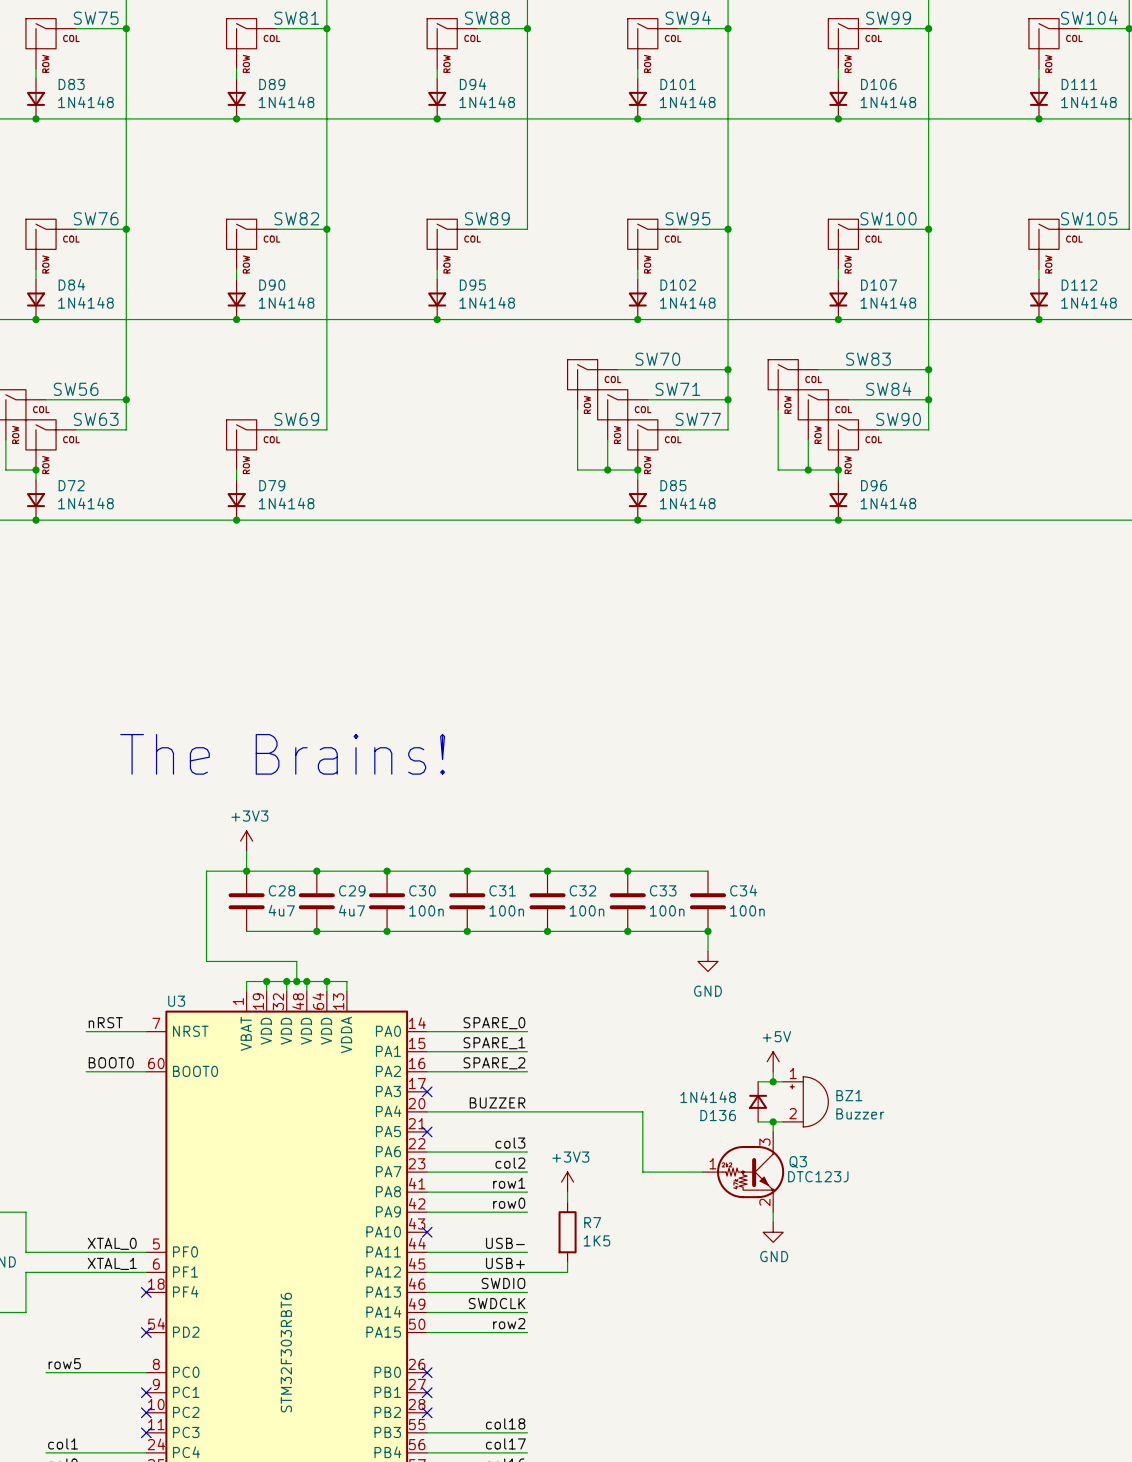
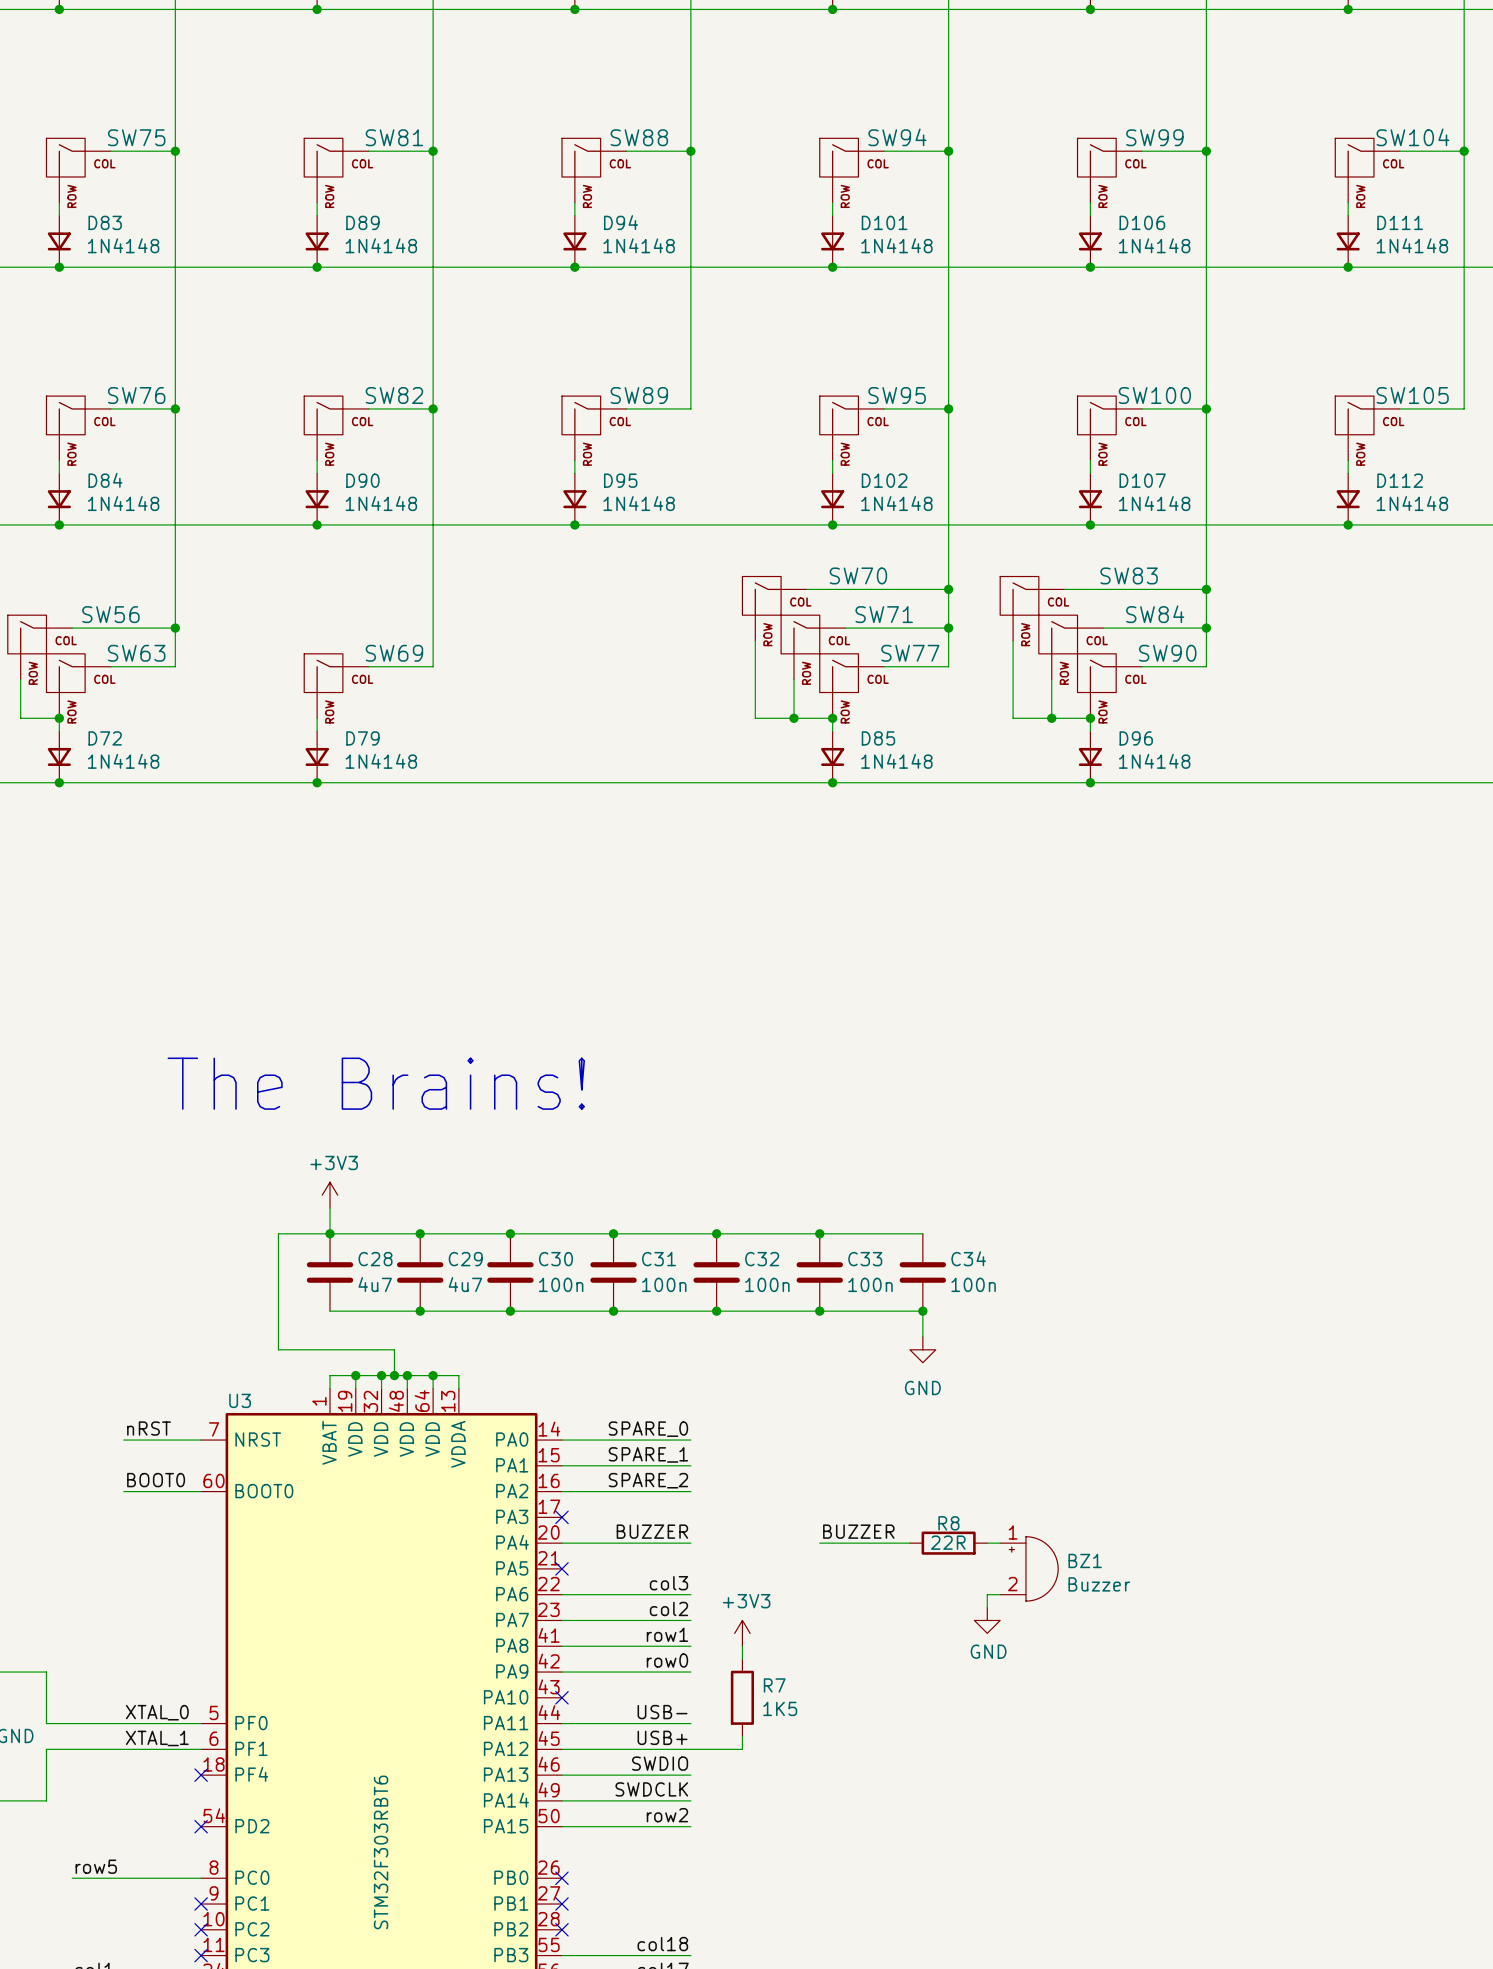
power symbol: +5V (773, 1061) -> none
wire: (773, 1071) (773, 1081) -> none
wire: (758, 1081) (783, 1081) -> none
junction: (773, 1081) -> none
D136: 1N4148 (758, 1101) -> none
BZ1 position: (805, 1101) -> (1029, 1568)
label: none -> BUZZER (858, 1531)
wire: (527, 1111) (627, 1111) -> none
wire: (642, 1111) (642, 1172) (702, 1172) -> (839, 1543) (909, 1543)
R8: none -> 22R (948, 1543)
wire: none -> (987, 1543) (1000, 1543)
wire: (758, 1121) (783, 1121) -> none
wire: (773, 1121) (773, 1131) -> none
junction: (773, 1121) -> none
wire: none -> (1000, 1594) (987, 1594) (987, 1607)
Q3: DTC123J (743, 1172) -> none
wire: (773, 1212) (773, 1222) -> none
power symbol position: GND (773, 1232) -> GND (987, 1620)

